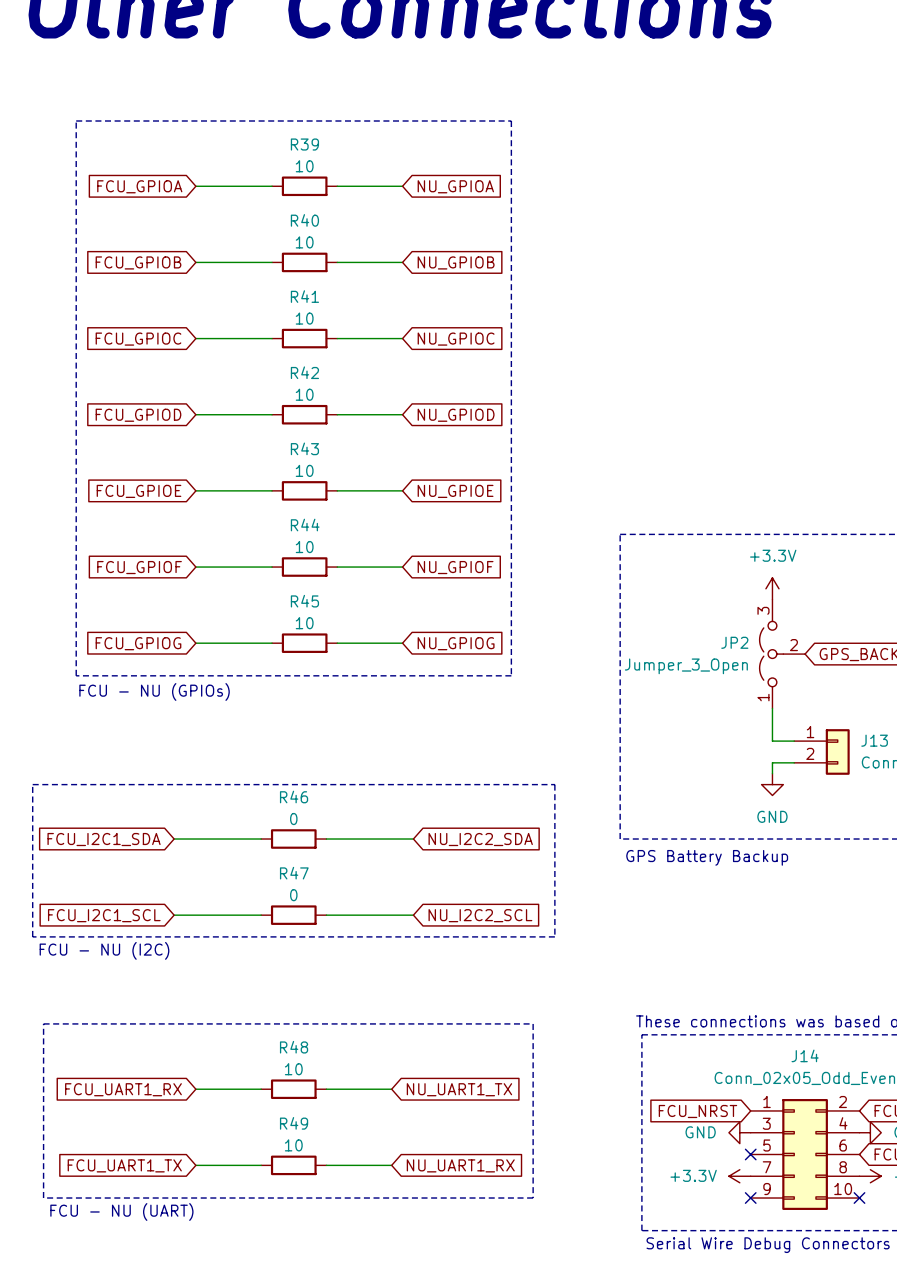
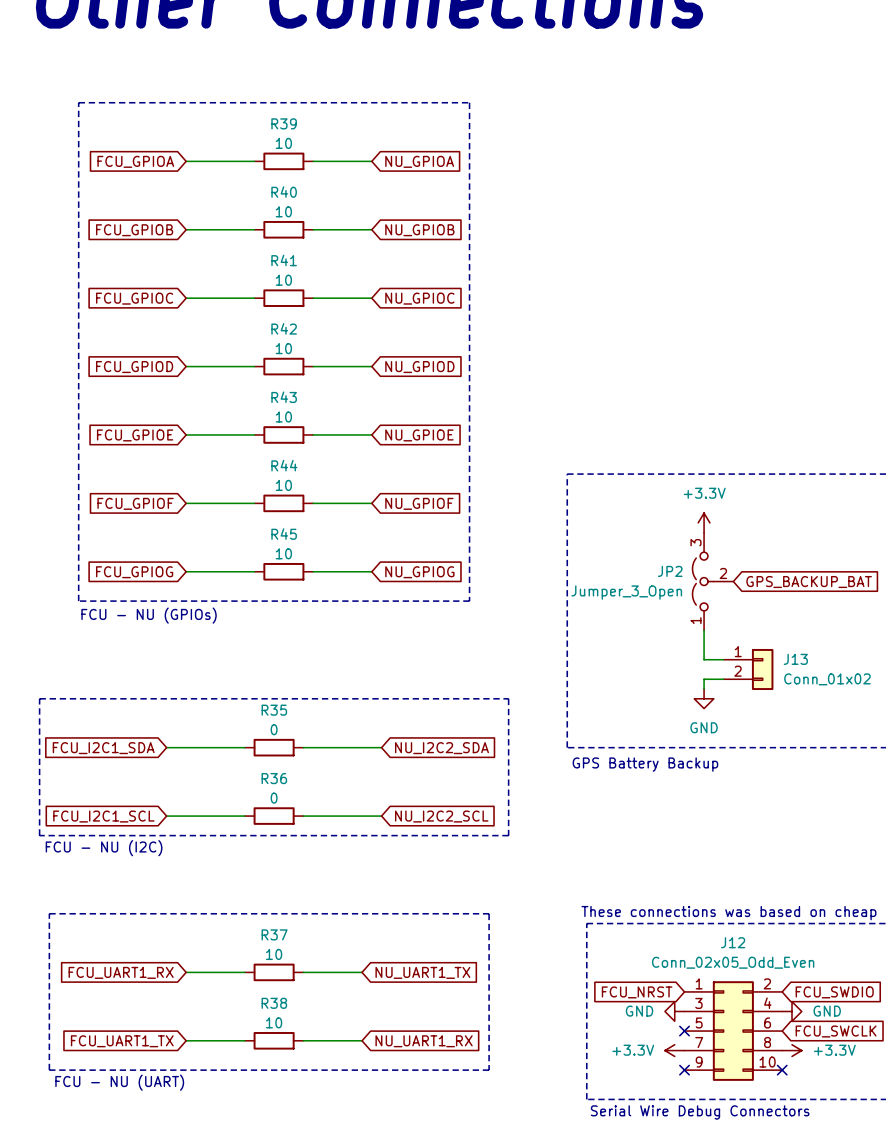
R46 name: R46 (294, 797) -> R35 (274, 710)
R47 name: R47 (294, 873) -> R36 (274, 778)
R48 name: R48 (294, 1047) -> R37 (274, 934)
J14 name: J14 (805, 1055) -> J12 (733, 942)
R49 name: R49 (294, 1123) -> R38 (274, 1003)

